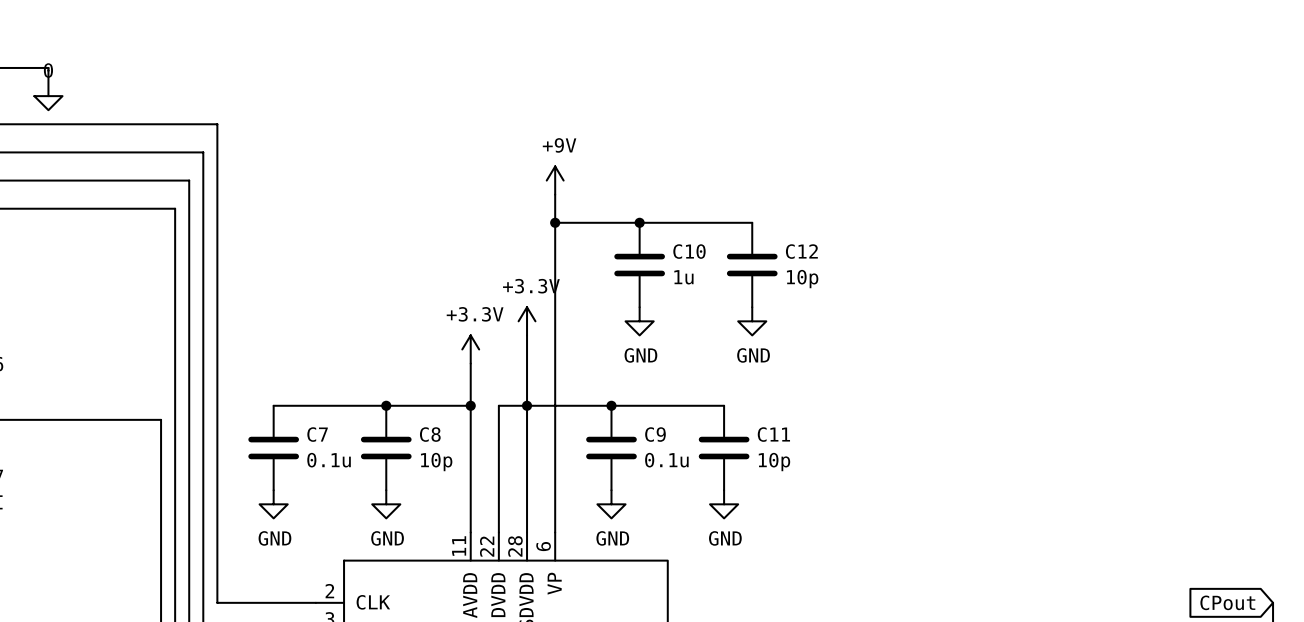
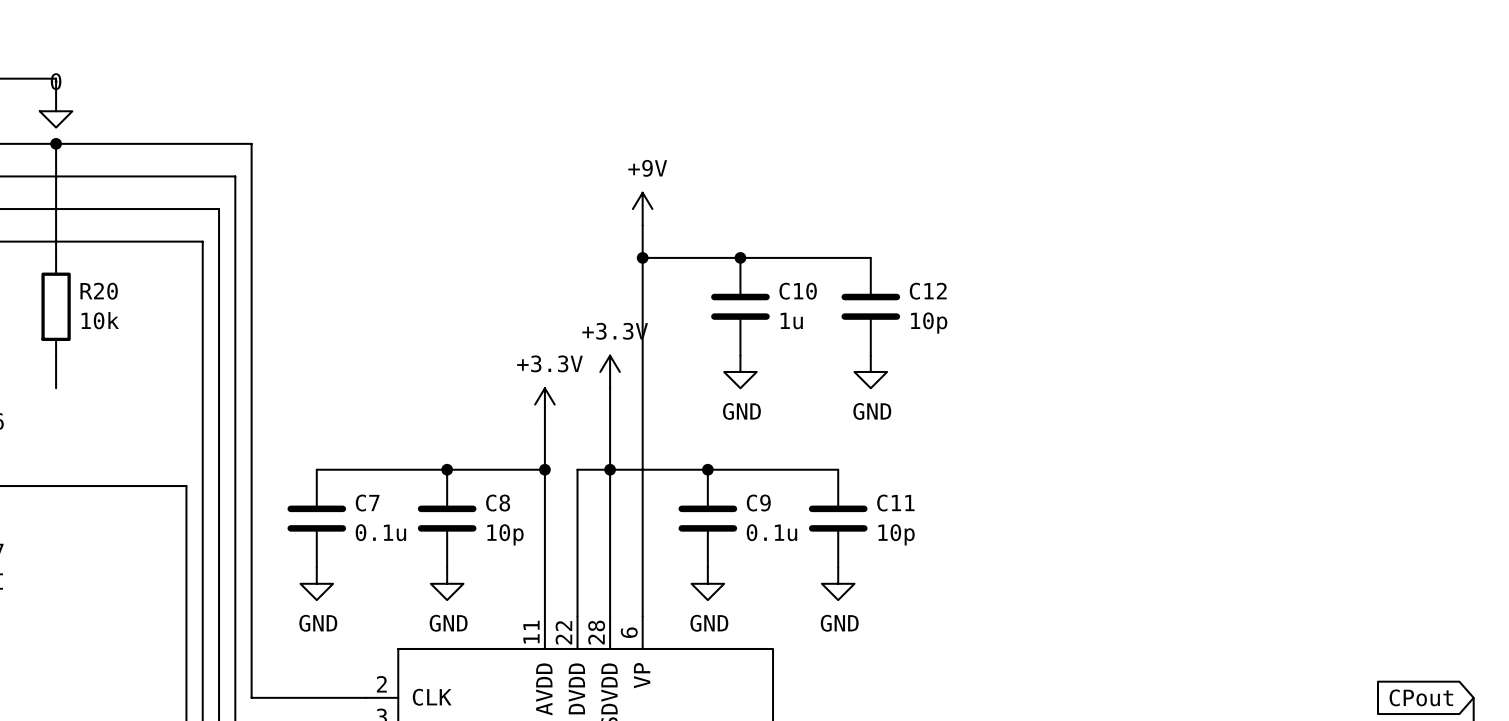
wire: none -> (56, 143) (56, 257)
junction: none -> (56, 143)
R20: none -> 10k (56, 306)
wire: none -> (56, 355) (56, 388)

